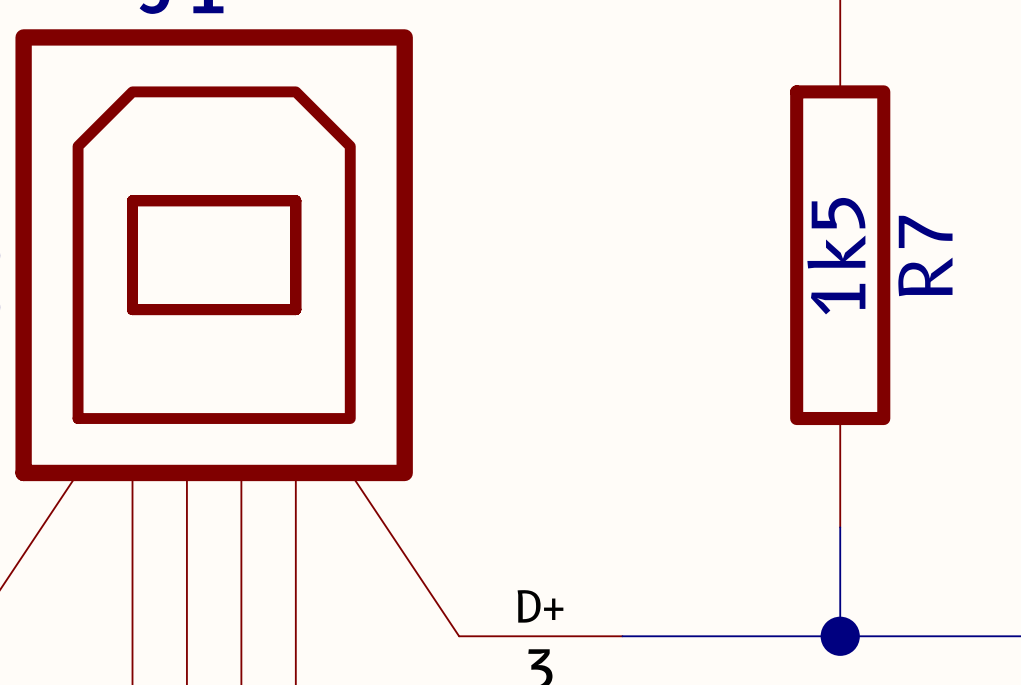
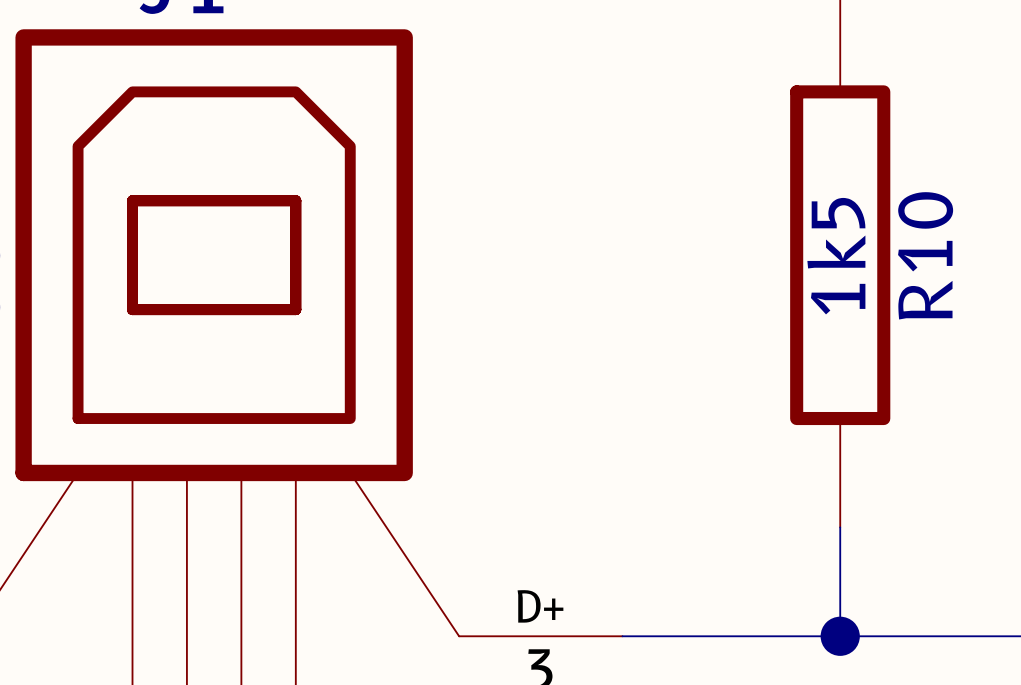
R7 name: R7 (925, 256) -> R10 (925, 255)

